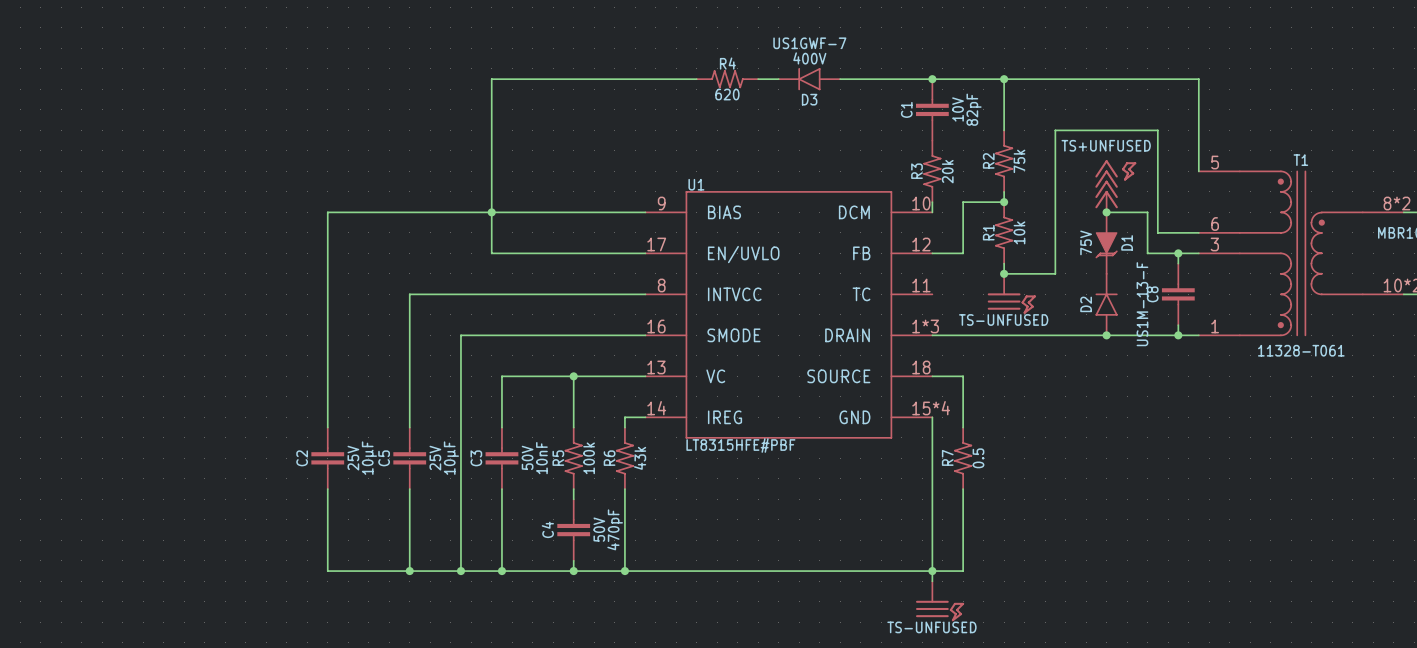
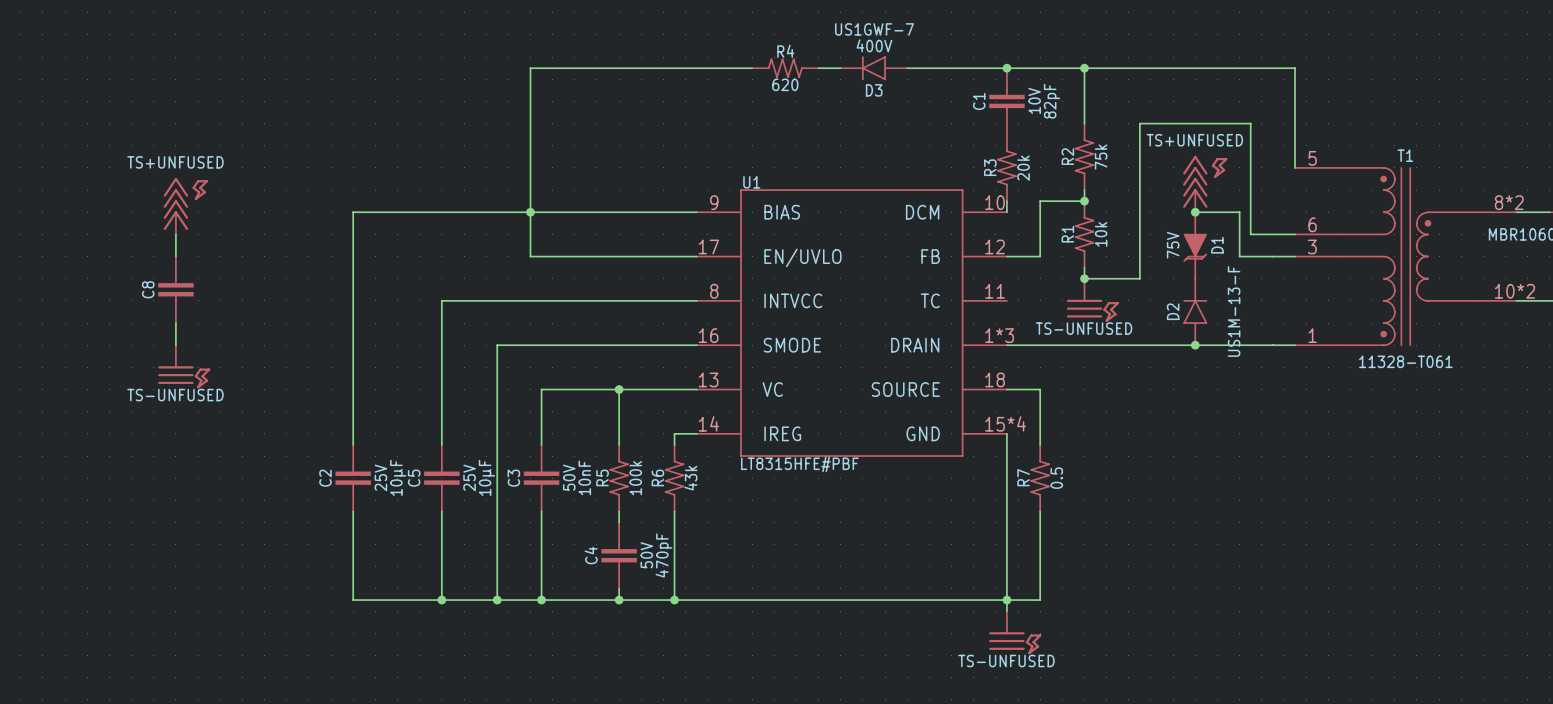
power symbol: none -> TS+UNFUSED (185, 206)
wire: none -> (175, 234) (175, 256)
wire: (1178, 253) (1178, 263) -> none
junction: (1178, 253) -> none
C8 position: (1178, 294) -> (175, 289)
wire: none -> (175, 323) (175, 345)
wire: (1178, 325) (1178, 335) -> none
junction: (1178, 335) -> none
power symbol: none -> TS-UNFUSED (184, 366)

